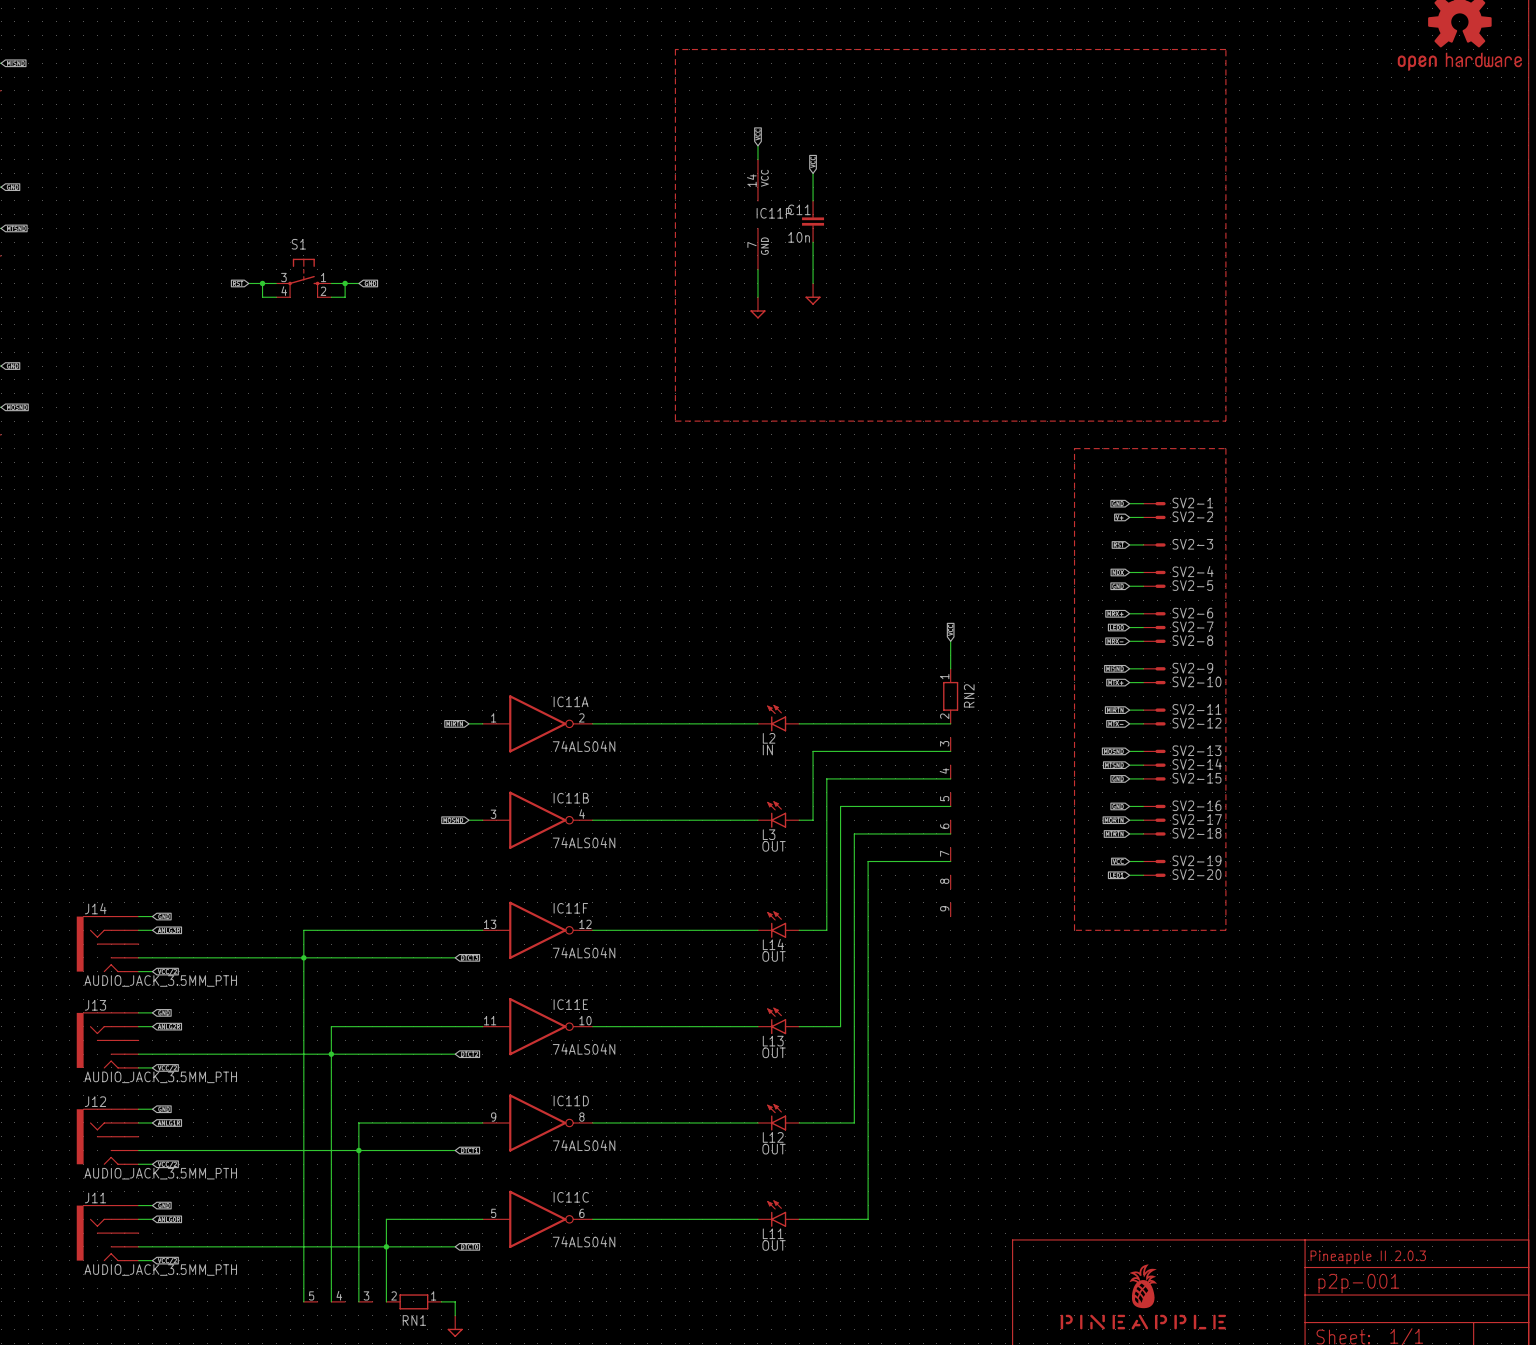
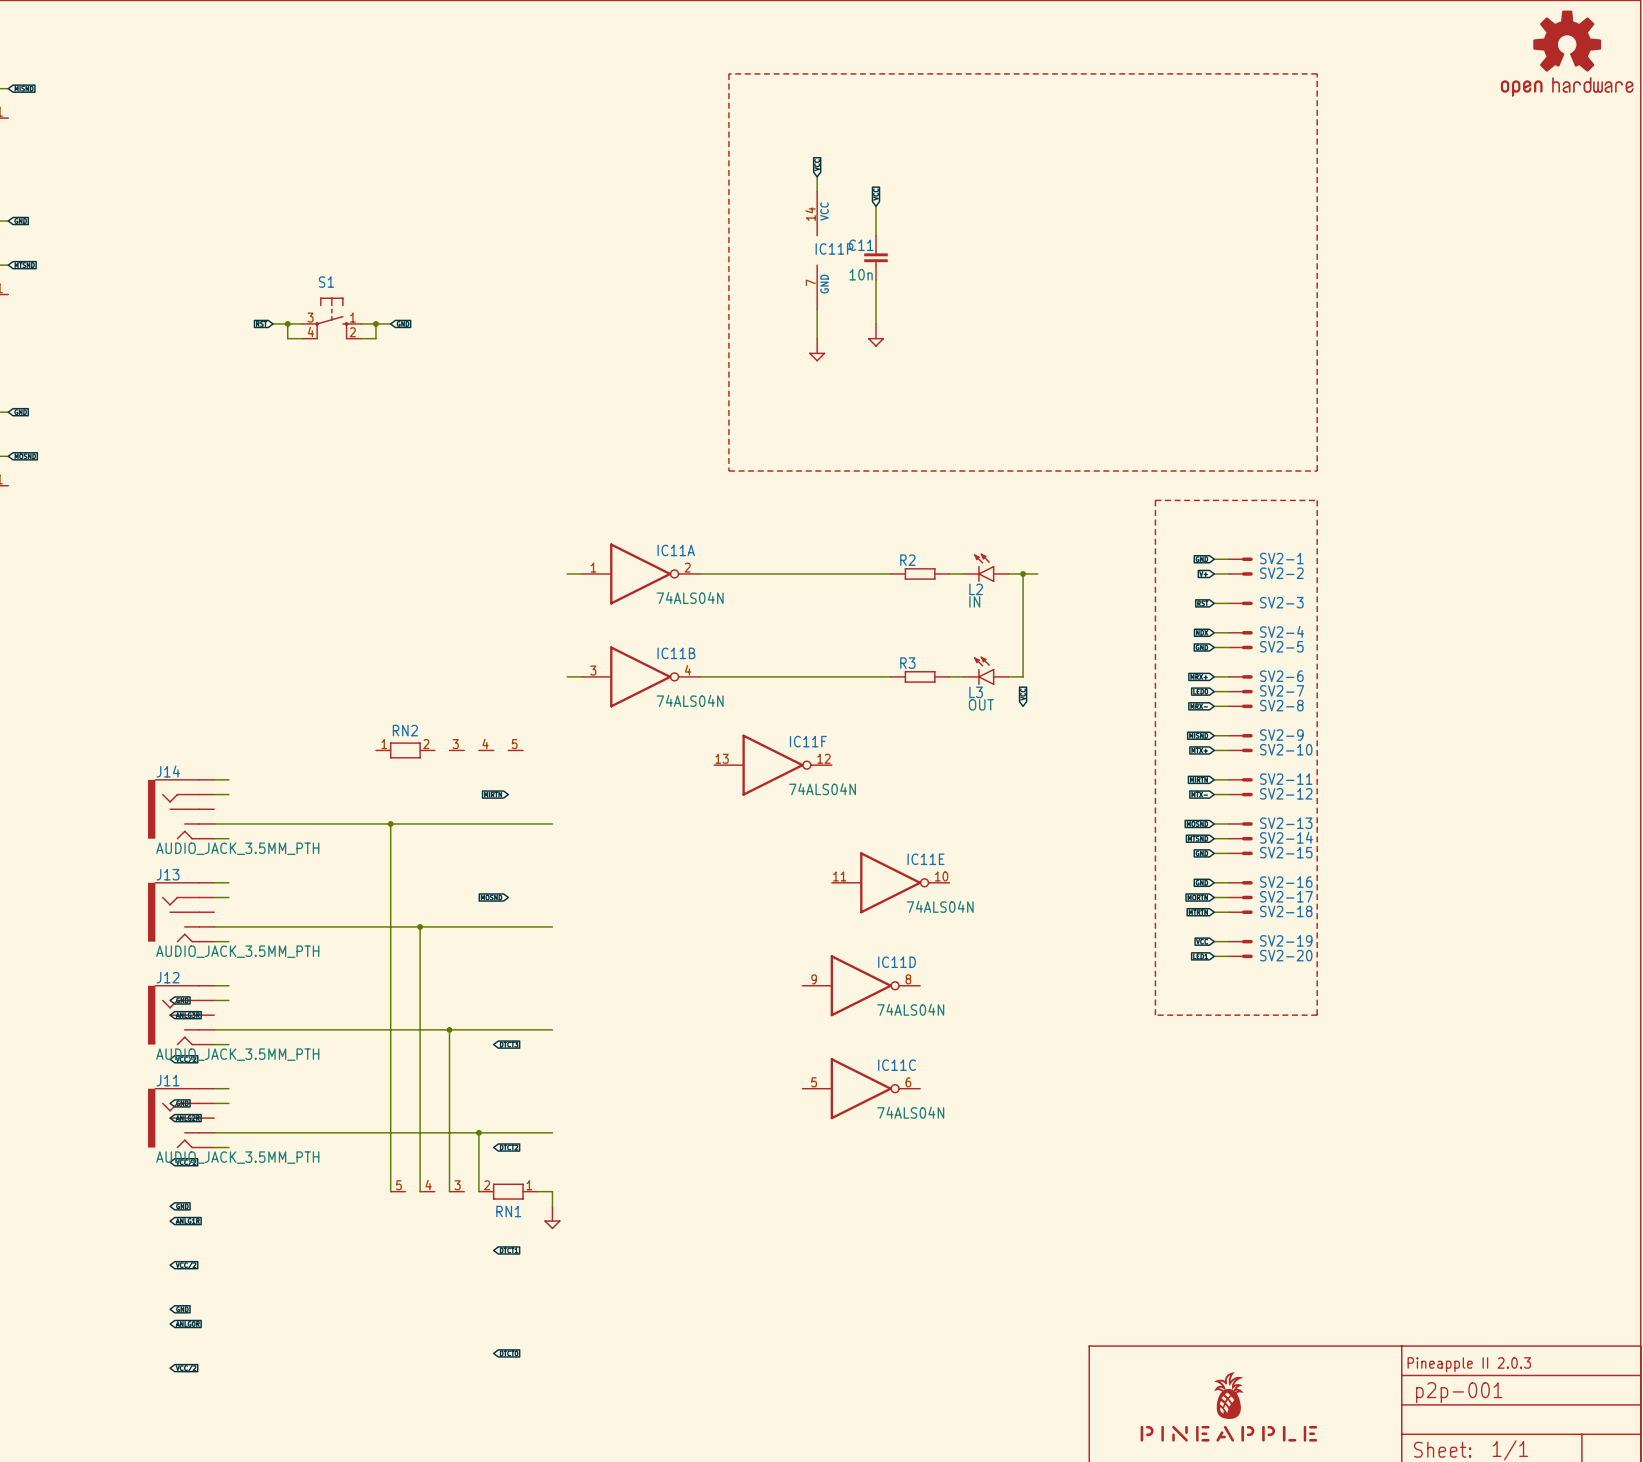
wire: none -> (567, 573) (581, 573)
wire: none -> (699, 573) (890, 573)
R2: none -> (920, 573)
wire: none -> (949, 573) (964, 573)
wire: none -> (1008, 573) (1037, 573)
wire: none -> (1023, 573) (1023, 676) (1008, 676)
junction: none -> (1023, 573)
wire: none -> (699, 676) (890, 676)
R3: none -> (920, 676)
wire: none -> (949, 676) (964, 676)
wire: (950, 641) (950, 668) -> none
RN2 symbol: [943, 668, 959, 917] -> [375, 742, 524, 759]
RN2 name position: RN2 (969, 695) -> RN2 (405, 730)
wire: none -> (214, 779) (228, 779)
L2 position: (778, 718) -> (986, 567)
wire: none -> (214, 794) (228, 794)
wire: (468, 723) (482, 723) -> (567, 676) (581, 676)
IC11A position: (537, 723) -> (640, 573)
wire: (592, 723) (757, 723) -> none
wire: (799, 723) (950, 723) -> none
wire: none -> (214, 823) (552, 823)
wire: none -> (390, 823) (390, 1191)
junction: none -> (390, 823)
wire: (950, 751) (813, 751) (813, 820) (799, 820) -> none
wire: none -> (214, 838) (228, 838)
wire: (950, 778) (826, 778) (826, 930) (799, 930) -> none
wire: (950, 806) (840, 806) (840, 1026) (799, 1026) -> none
L3 position: (778, 814) -> (986, 670)
wire: (468, 820) (482, 820) -> none
IC11B position: (537, 820) -> (640, 676)
wire: (592, 820) (757, 820) -> none
wire: (950, 833) (854, 833) (854, 1122) (799, 1122) -> none
wire: none -> (214, 926) (552, 926)
wire: none -> (420, 926) (420, 1191)
junction: none -> (420, 926)
wire: (950, 861) (868, 861) (868, 1219) (799, 1219) -> none
wire: (138, 916) (152, 916) -> (214, 882) (228, 882)
L14: OUT (778, 924) -> none
wire: (138, 930) (152, 930) -> (214, 897) (228, 897)
wire: (482, 930) (303, 930) (303, 1301) -> none
IC11F position: (537, 930) -> (773, 765)
wire: (592, 930) (757, 930) -> none
J14 position: (107, 944) -> (181, 809)
wire: none -> (214, 1029) (552, 1029)
wire: none -> (449, 1029) (449, 1191)
junction: none -> (449, 1029)
wire: (138, 957) (193, 957) -> none
wire: (207, 957) (455, 957) -> none
junction: (303, 957) -> none
wire: (138, 971) (152, 971) -> (214, 941) (228, 941)
wire: (138, 1012) (152, 1012) -> (214, 985) (228, 985)
L13: OUT (778, 1020) -> none
wire: (138, 1026) (152, 1026) -> (214, 1000) (228, 1000)
wire: (482, 1026) (331, 1026) (331, 1301) -> none
IC11E position: (537, 1026) -> (890, 882)
wire: (592, 1026) (757, 1026) -> none
J13 position: (107, 1040) -> (181, 912)
wire: none -> (478, 1132) (478, 1191)
junction: none -> (478, 1132)
wire: (138, 1054) (193, 1054) -> none
wire: (207, 1054) (455, 1054) -> none
junction: (331, 1054) -> none
wire: (138, 1067) (152, 1067) -> none
wire: none -> (537, 1191) (552, 1191) (552, 1206)
wire: (138, 1109) (152, 1109) -> (214, 1088) (228, 1088)
L12: OUT (778, 1117) -> none
power symbol: none -> (552, 1217)
wire: (138, 1122) (152, 1122) -> (214, 1103) (228, 1103)
wire: (482, 1122) (358, 1122) (358, 1301) -> none
IC11D position: (537, 1122) -> (861, 985)
wire: (592, 1122) (757, 1122) -> none
J12 position: (107, 1136) -> (181, 1015)
wire: (138, 1150) (455, 1150) -> (214, 1132) (552, 1132)
junction: (358, 1150) -> none
wire: (138, 1164) (152, 1164) -> none
wire: (138, 1205) (152, 1205) -> none
L11: OUT (778, 1213) -> none
wire: (138, 1219) (152, 1219) -> none
wire: (482, 1219) (386, 1219) (386, 1301) -> none
IC11C position: (537, 1219) -> (861, 1088)
wire: (592, 1219) (757, 1219) -> none
J11 position: (107, 1233) -> (181, 1118)
wire: (138, 1246) (455, 1246) -> none
junction: (386, 1246) -> none
wire: (138, 1260) (152, 1260) -> none
RN1 position: (372, 1301) -> (464, 1191)
wire: (441, 1301) (455, 1301) (455, 1315) -> none
power symbol: (455, 1326) -> none

